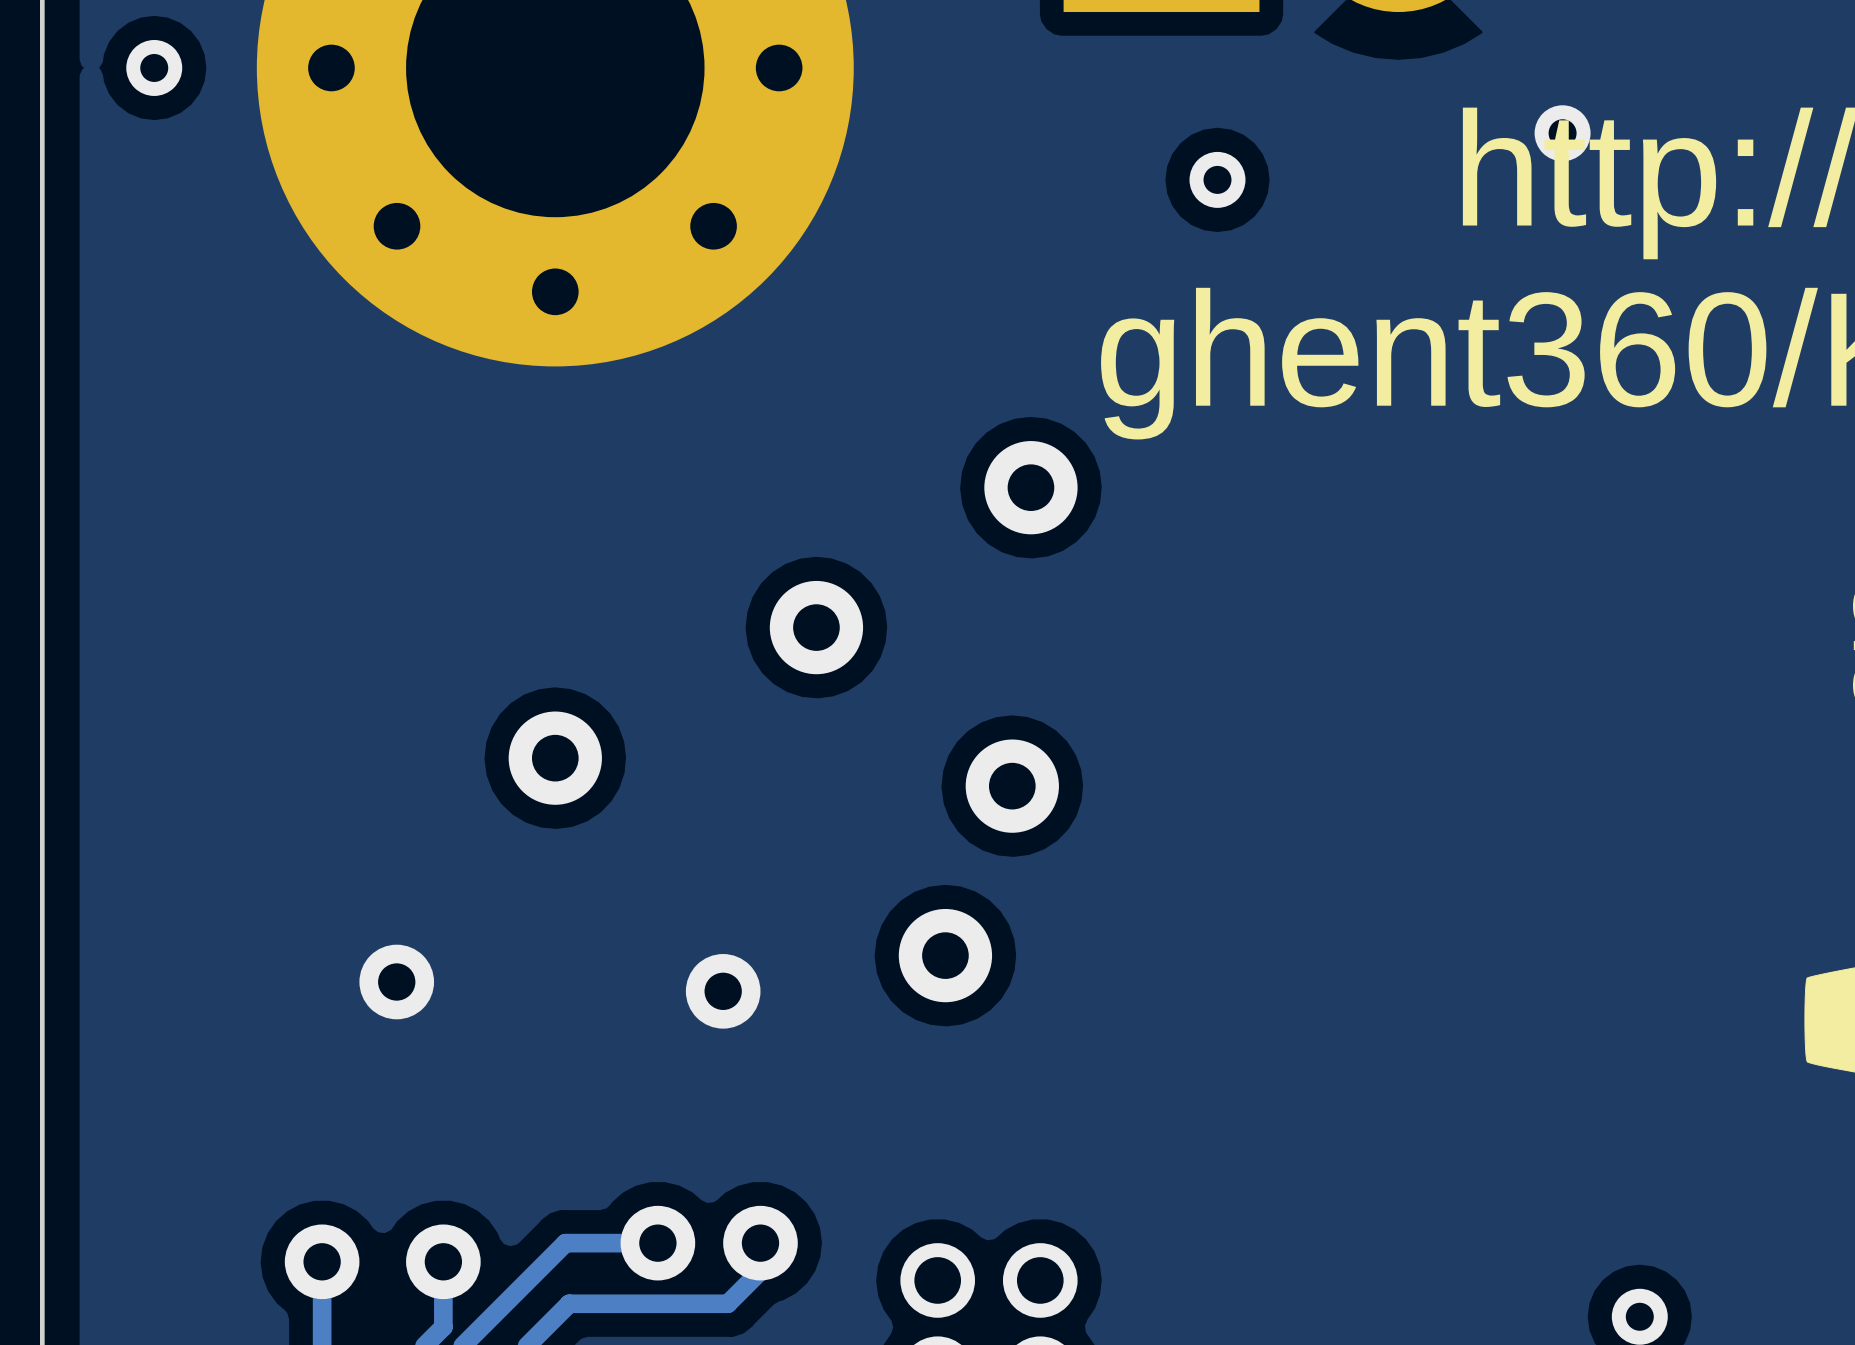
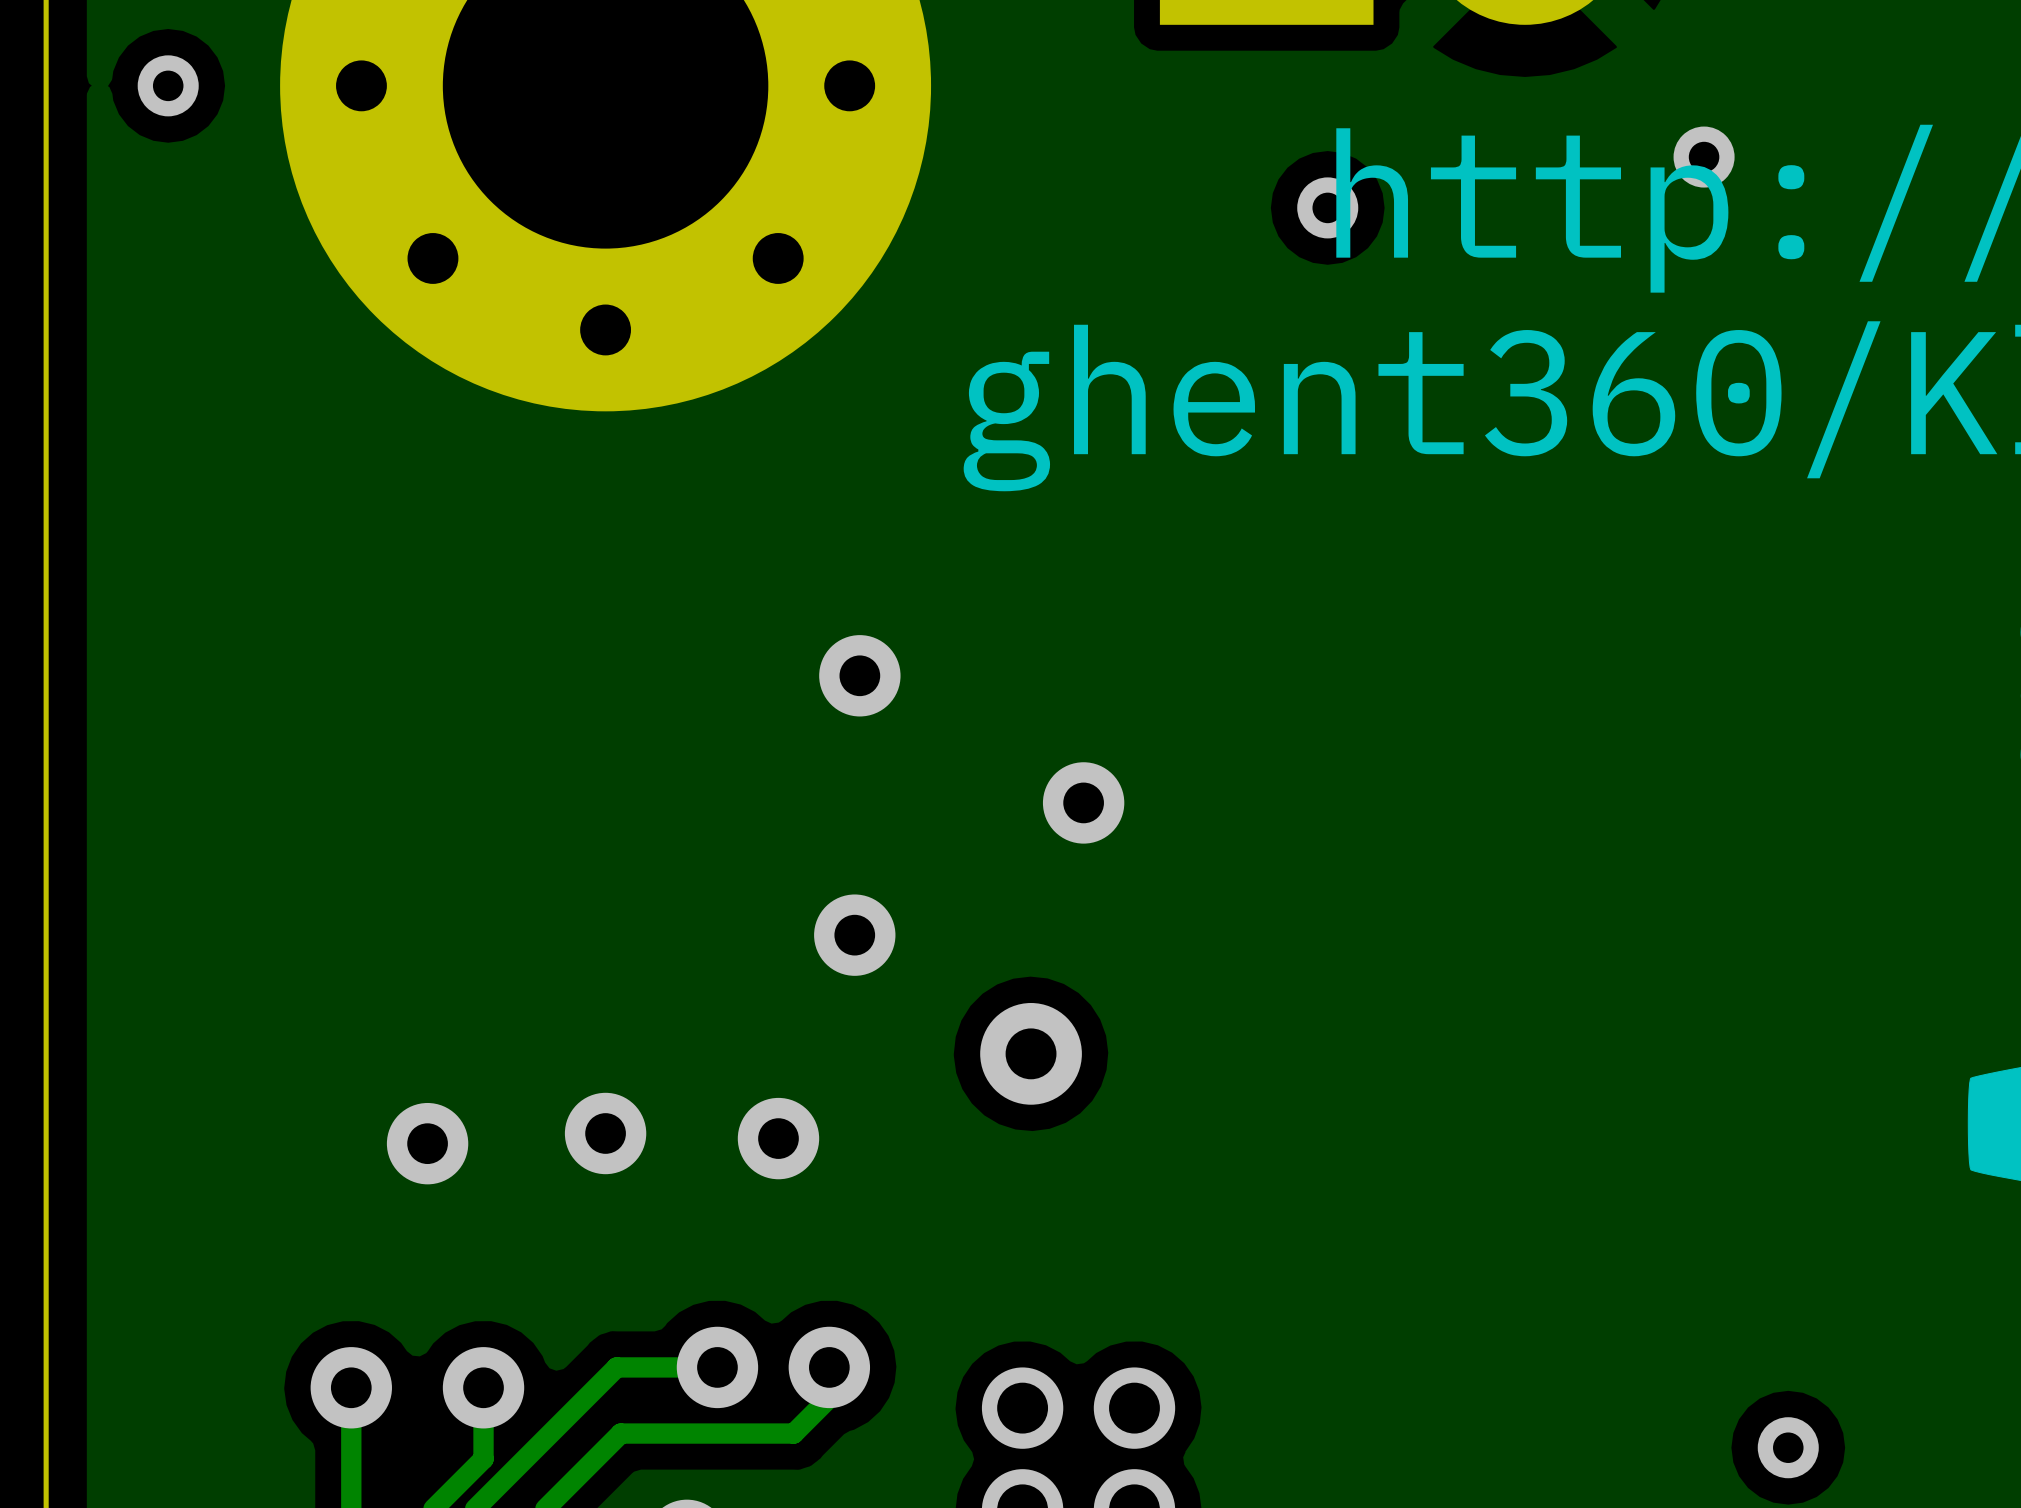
via: (1030, 487) -> none
via size: [769, 580, 864, 675] -> [819, 635, 901, 717]
via: (555, 758) -> none
via position: (1012, 786) -> (1083, 802)
via: none -> (854, 935)
via position: (396, 982) -> (427, 1143)
via position: (723, 991) -> (778, 1138)
via: none -> (605, 1133)

